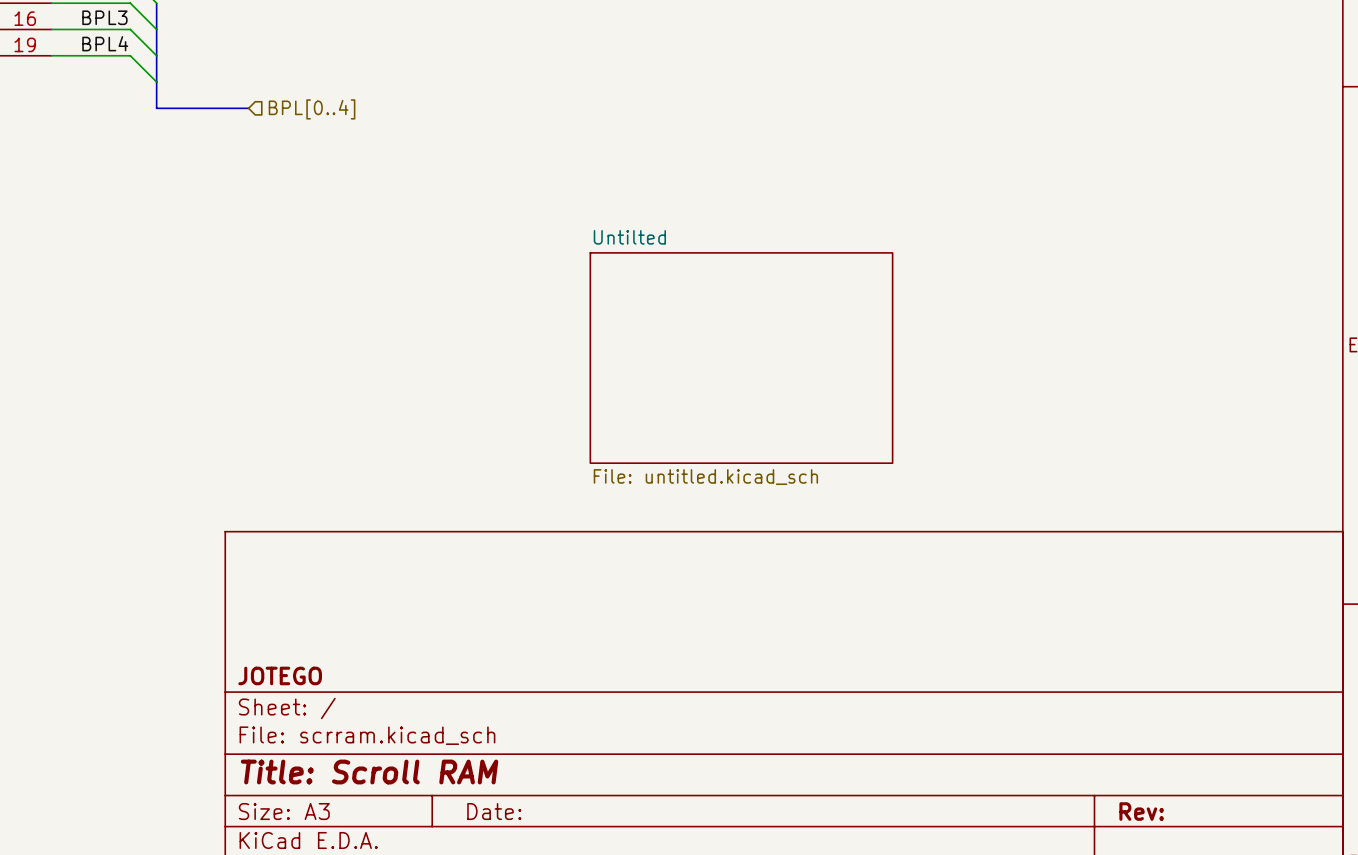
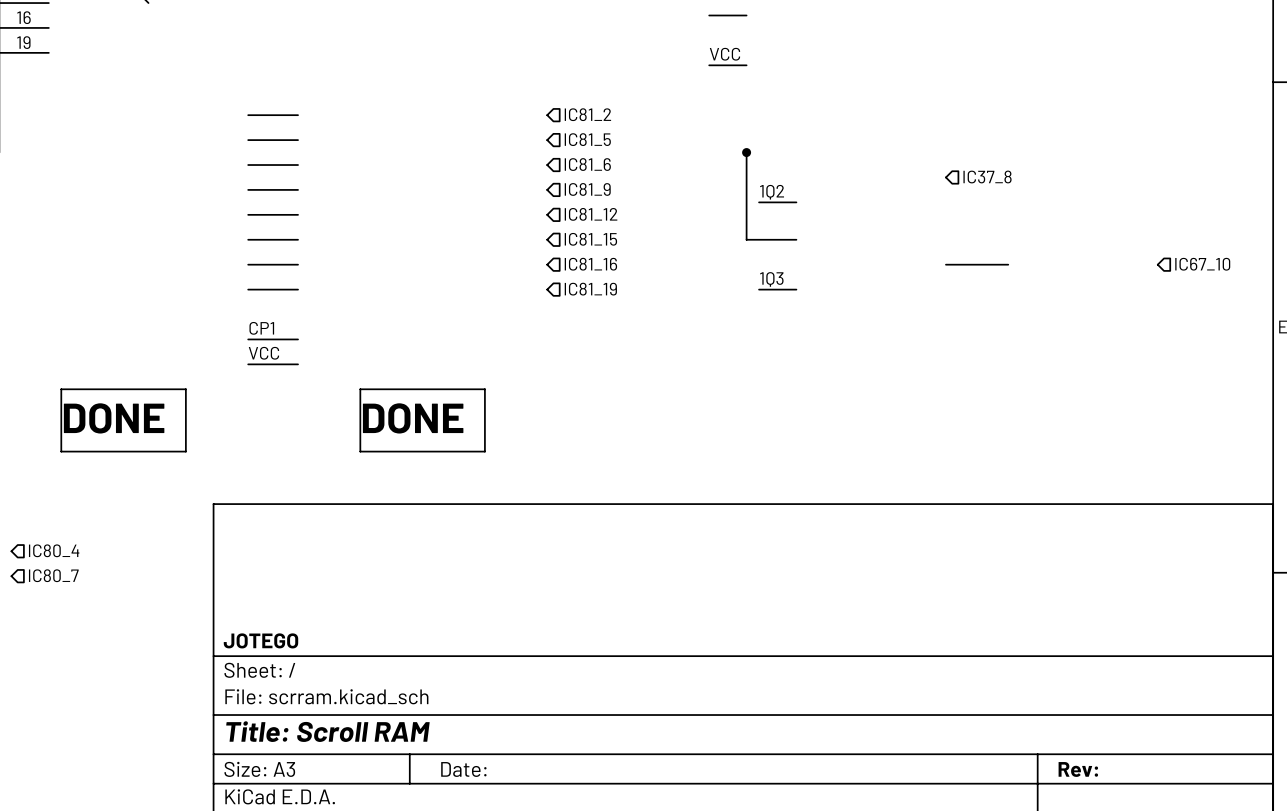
wire: (51, 3) (130, 3) (156, 29) -> none
bus: (156, 3) (156, 108) (248, 108) -> none
wire: none -> (709, 15) (746, 15)
label: BPL3 (104, 17) -> none
wire: (51, 29) (130, 29) (156, 55) -> none
label: BPL4 (105, 43) -> none
wire: (51, 55) (130, 55) (156, 82) -> none
label: none -> VCC (724, 54)
wire: none -> (709, 65) (746, 65)
hierarchical label: BPL[0..4] (312, 109) -> none
wire: none -> (248, 115) (298, 115)
hierarchical label: none -> IC81_2 (587, 114)
wire: none -> (248, 140) (298, 140)
hierarchical label: none -> IC81_5 (587, 139)
wire: none -> (746, 152) (746, 239) (796, 239)
junction: none -> (746, 152)
wire: none -> (248, 165) (298, 165)
hierarchical label: none -> IC81_6 (587, 164)
hierarchical label: none -> IC37_8 (987, 176)
wire: none -> (248, 189) (298, 189)
hierarchical label: none -> IC81_9 (587, 189)
label: none -> 1Q2 (772, 192)
wire: none -> (759, 202) (796, 202)
wire: none -> (248, 214) (298, 214)
hierarchical label: none -> IC81_12 (591, 214)
wire: none -> (248, 239) (298, 239)
hierarchical label: none -> IC81_15 (590, 239)
wire: none -> (248, 264) (298, 264)
hierarchical label: none -> IC81_16 (590, 264)
wire: none -> (945, 264) (1008, 264)
hierarchical label: none -> IC67_10 (1202, 264)
label: none -> 1Q3 (771, 279)
wire: none -> (248, 289) (298, 289)
hierarchical label: none -> IC81_19 (590, 289)
wire: none -> (759, 289) (796, 289)
label: none -> CP1 (261, 328)
wire: none -> (248, 339) (298, 339)
sheet Untilted: File: untitled.kicad_sch (741, 358) -> none
label: none -> VCC (263, 353)
wire: none -> (248, 364) (298, 364)
line: none -> (61, 389) (61, 451) (185, 451) (185, 389) (61, 389)
line: none -> (360, 389) (484, 389) (484, 451) (360, 451) (360, 389)
text: none -> DONE (114, 418)
text: none -> DONE (413, 418)
hierarchical label: none -> IC80_4 (54, 550)
hierarchical label: none -> IC80_7 (53, 575)

